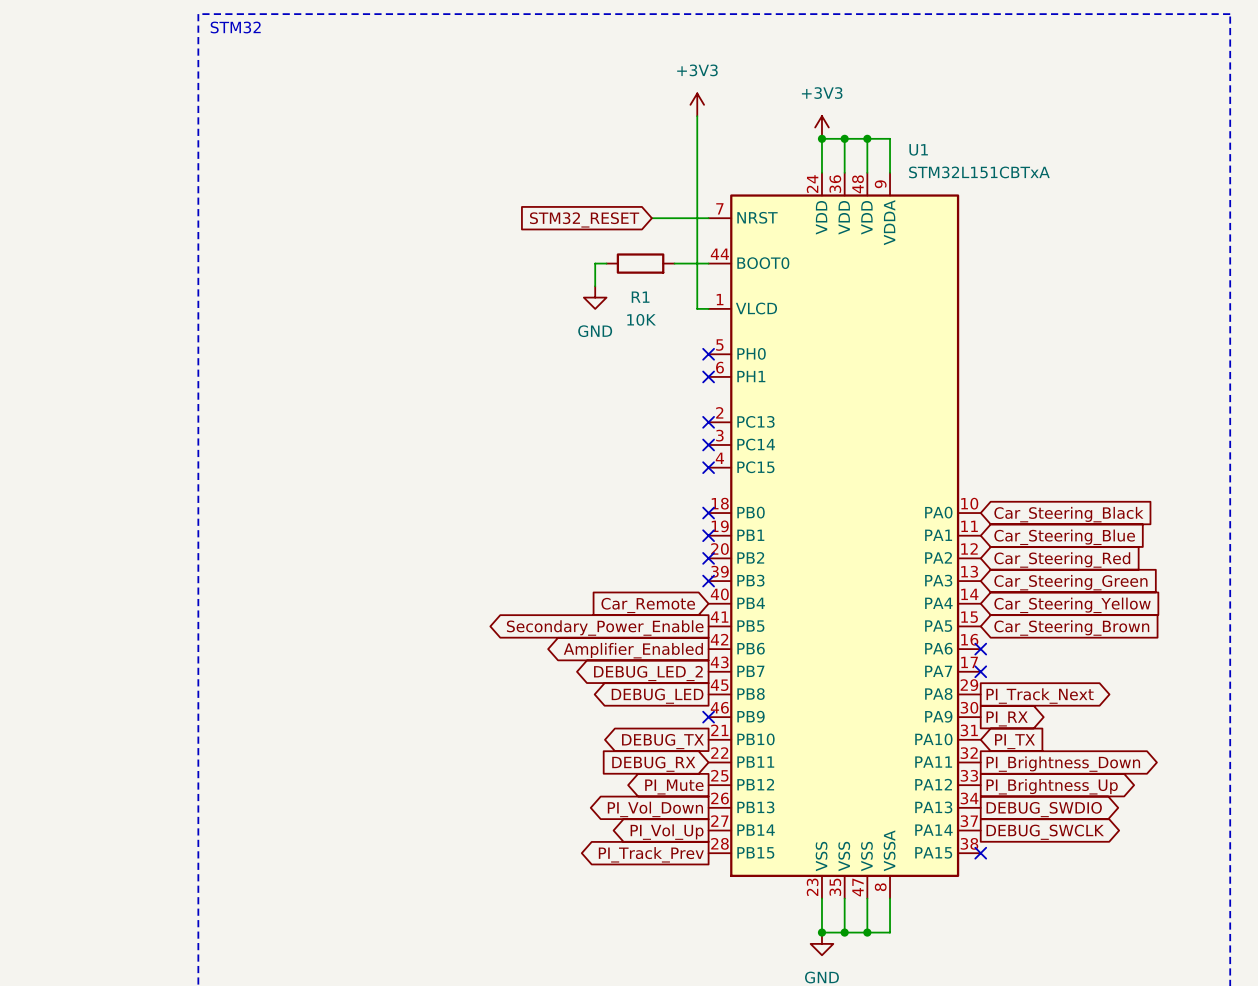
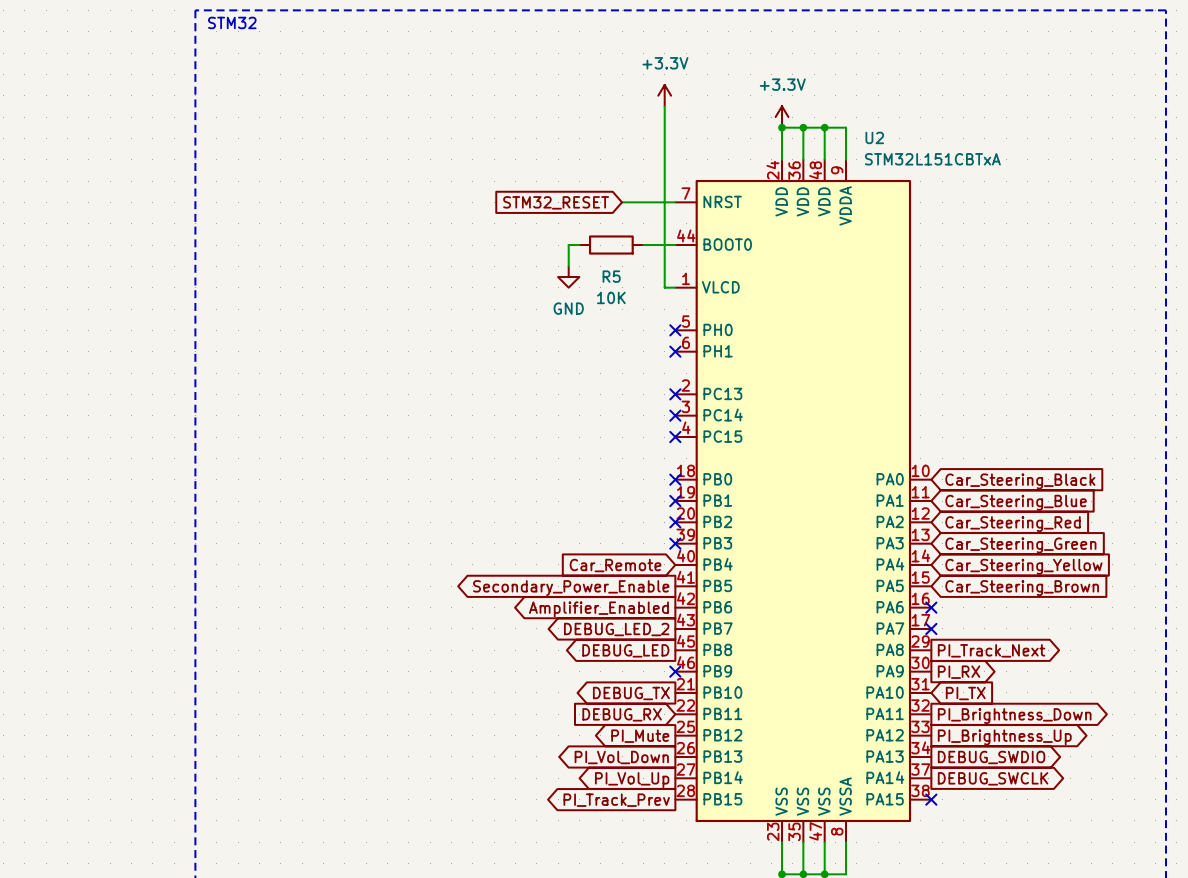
power symbol: +3V3 (697, 104) -> +3.3V (664, 95)
power symbol: +3V3 (821, 127) -> +3.3V (782, 117)
U1 name: U1 (918, 149) -> U2 (874, 137)
R1 name: R1 (640, 297) -> R5 (611, 276)

